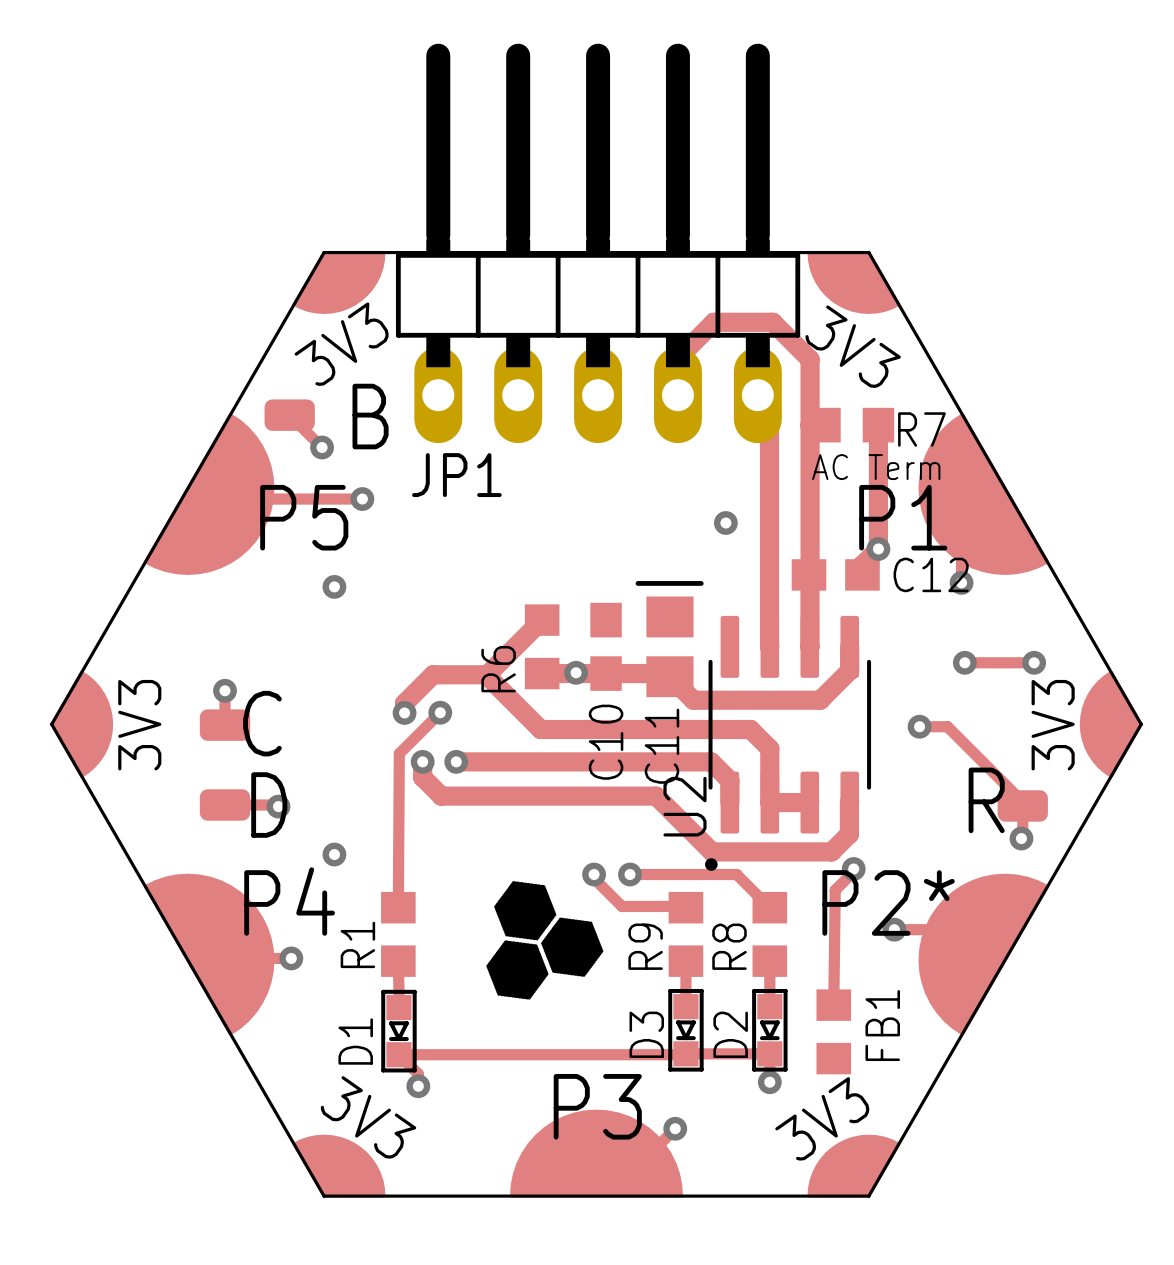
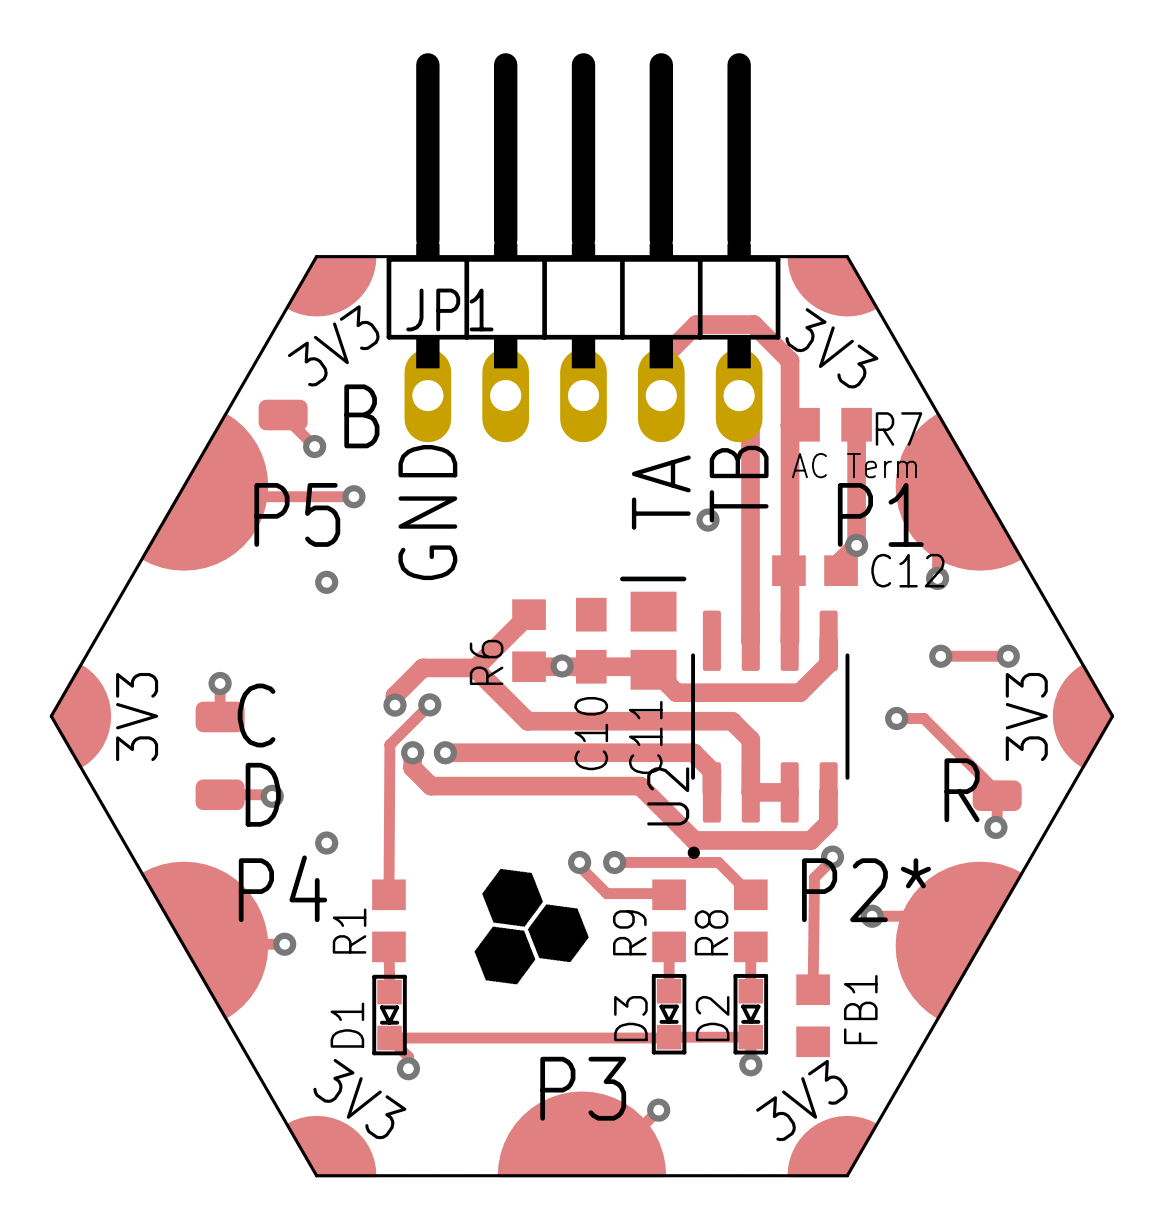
JP1 name position: JP1 (456, 475) -> JP1 (449, 309)
text: none -> TB (739, 484)
text: none -> TA (661, 492)
text: none -> GND (427, 512)

